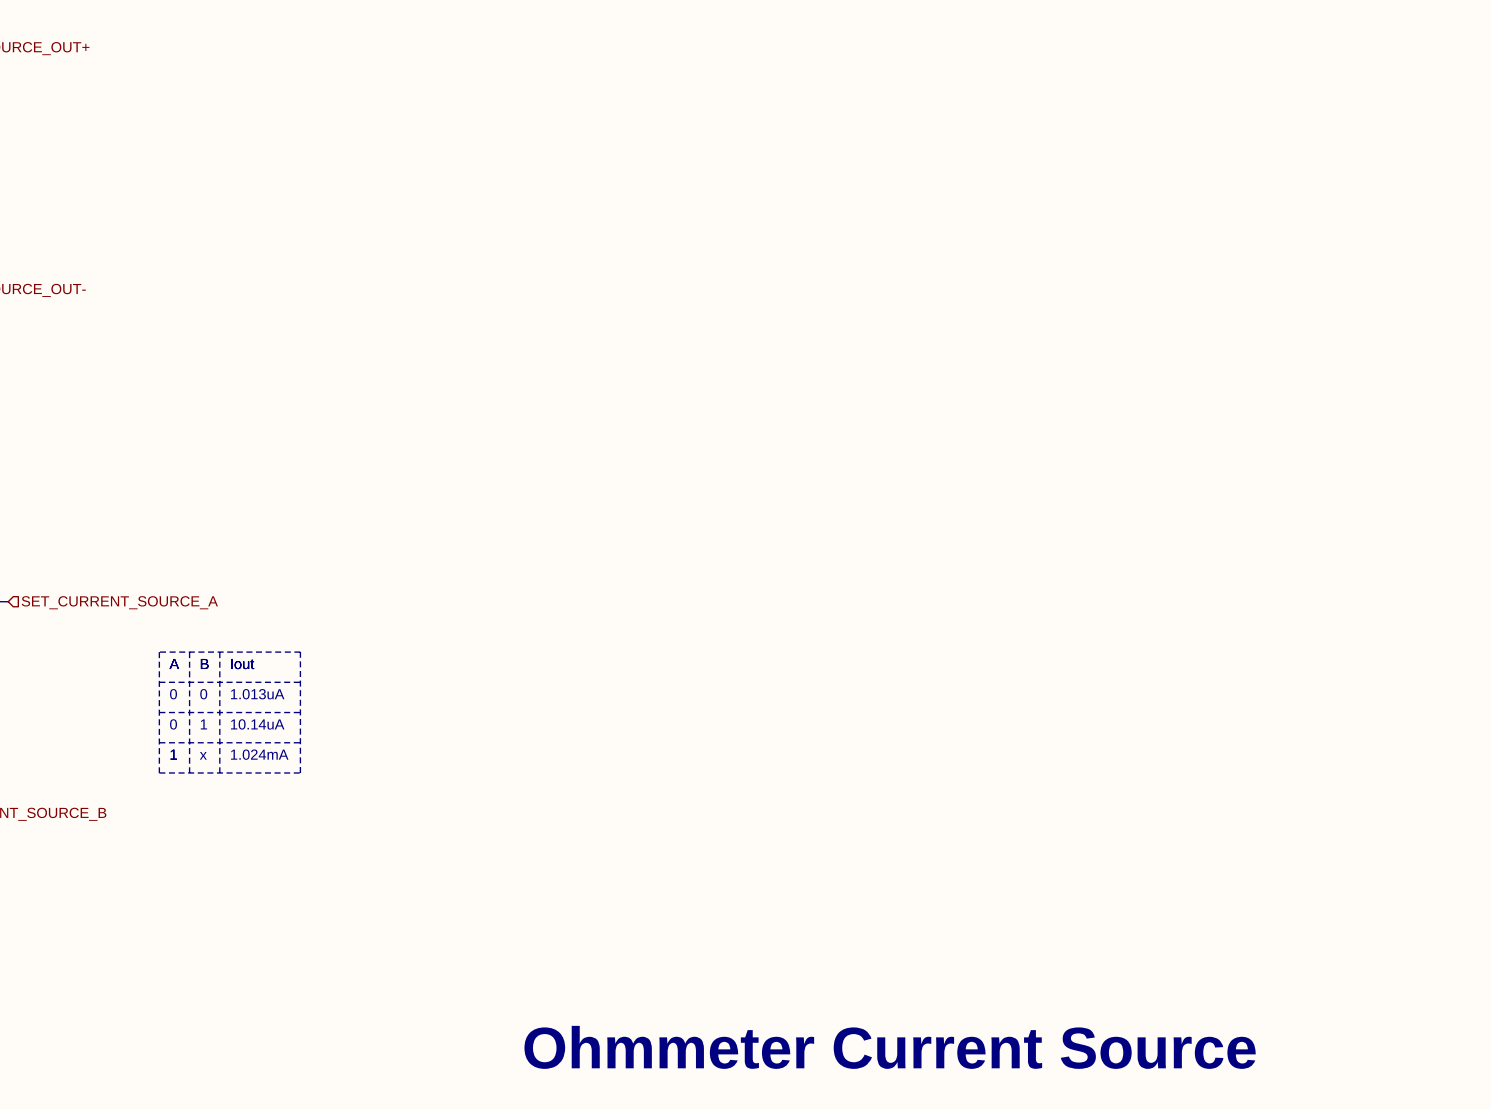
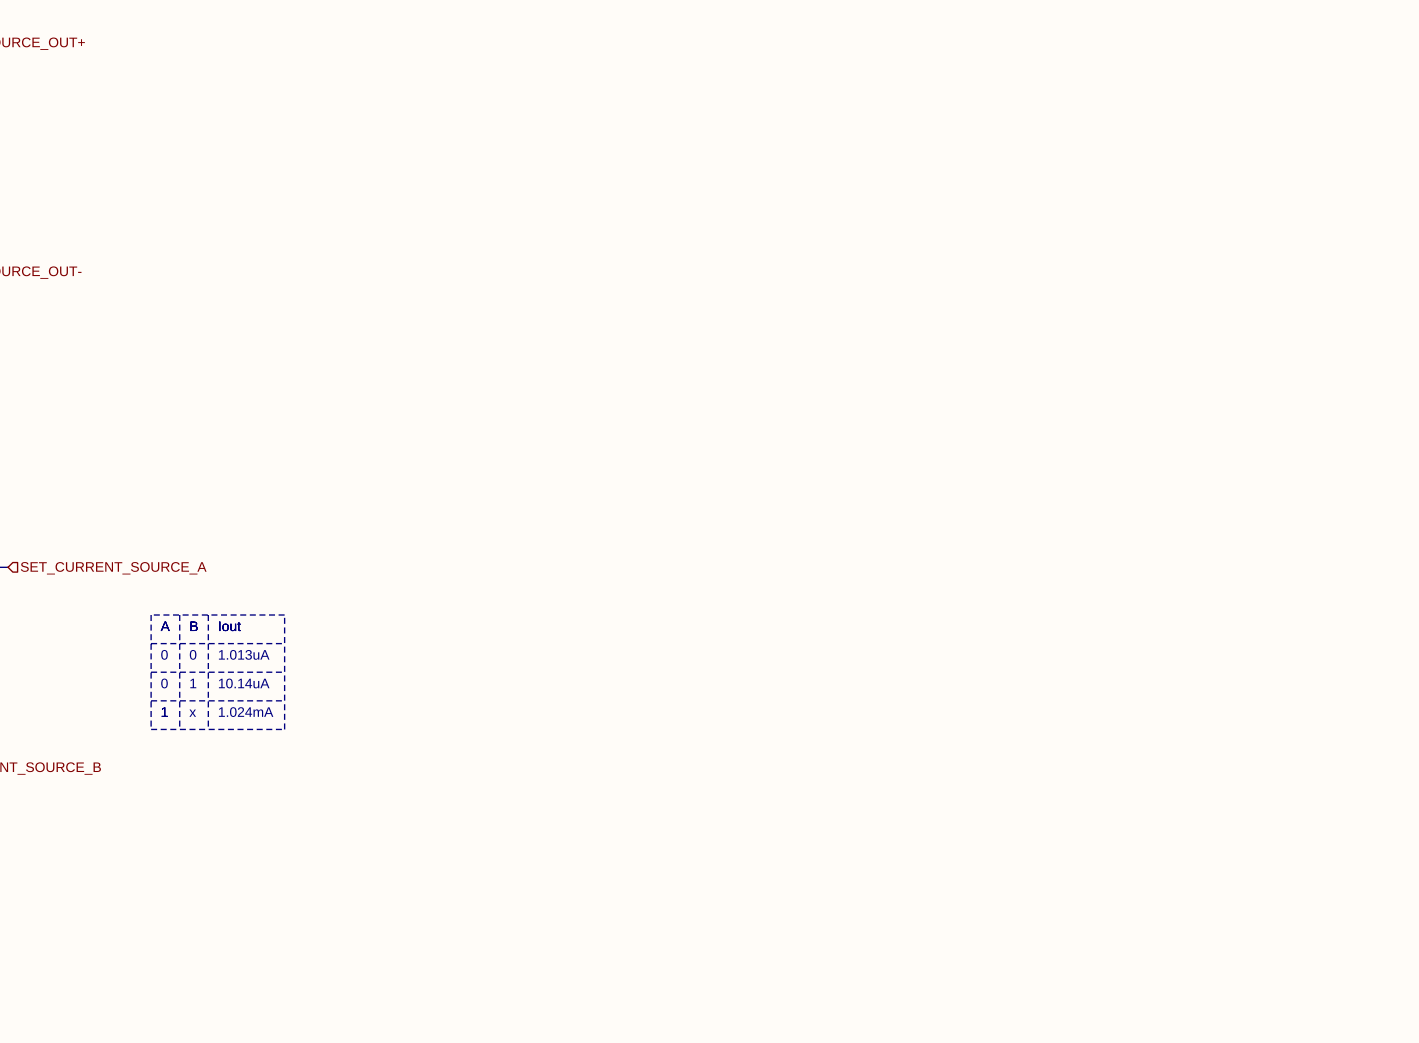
text: Ohmmeter Current Source (890, 1047) -> none

